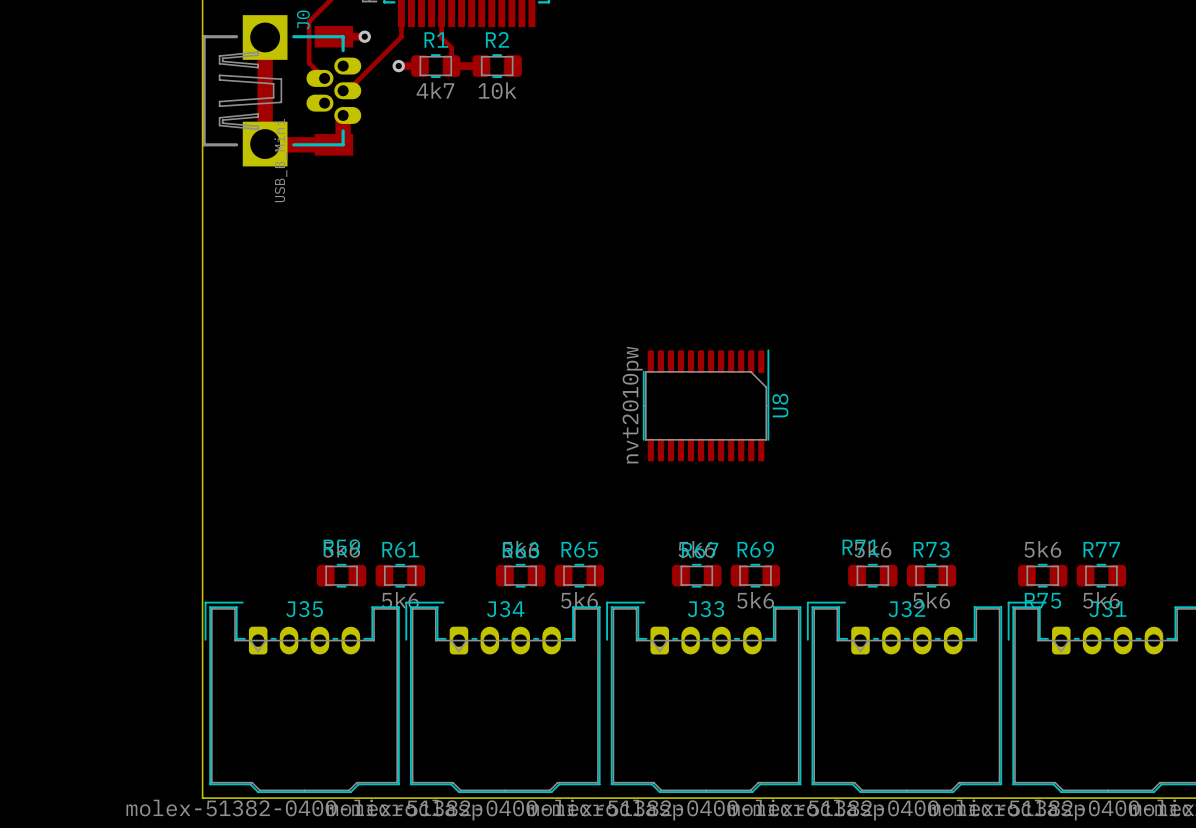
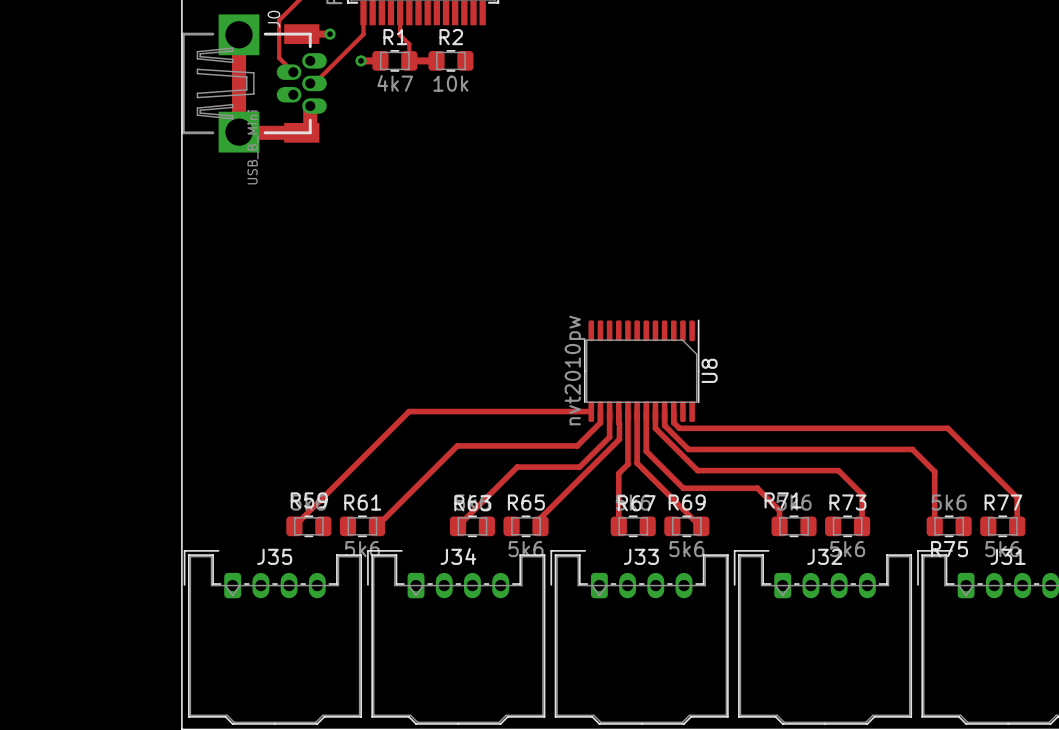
track: none -> (591, 411) (409, 411) (294, 526)
track: none -> (600, 411) (600, 422) (577, 445) (457, 445) (376, 526)
track: none -> (609, 411) (609, 437) (579, 467) (517, 467) (457, 526)
track: none -> (618, 411) (619, 439) (540, 518) (540, 526)
track: none -> (627, 411) (627, 464) (618, 473) (618, 526)
track: none -> (637, 411) (637, 463) (701, 526)
track: none -> (646, 411) (646, 451) (683, 488) (757, 488) (779, 510) (779, 526)
track: none -> (655, 411) (655, 428) (697, 470) (838, 470) (862, 494) (862, 526)
track: none -> (664, 411) (664, 425) (688, 449) (912, 449) (934, 471) (934, 526)
track: none -> (673, 411) (673, 422) (679, 428) (947, 428) (1017, 497) (1017, 526)

